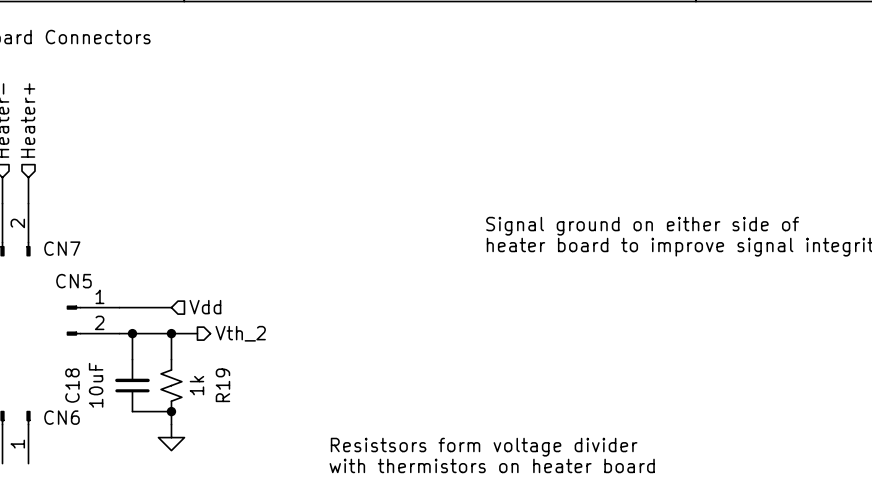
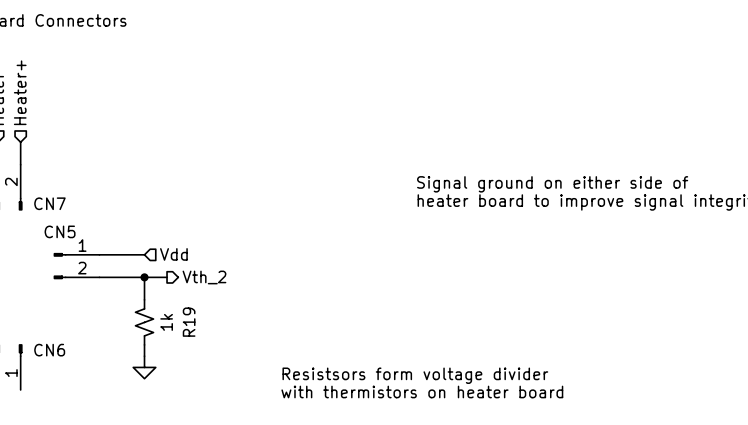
wire: (132, 333) (132, 359) -> none
junction: (132, 333) -> none
C18: 10uF (132, 385) -> none
wire: (132, 411) (171, 411) -> none
junction: (171, 411) -> none

